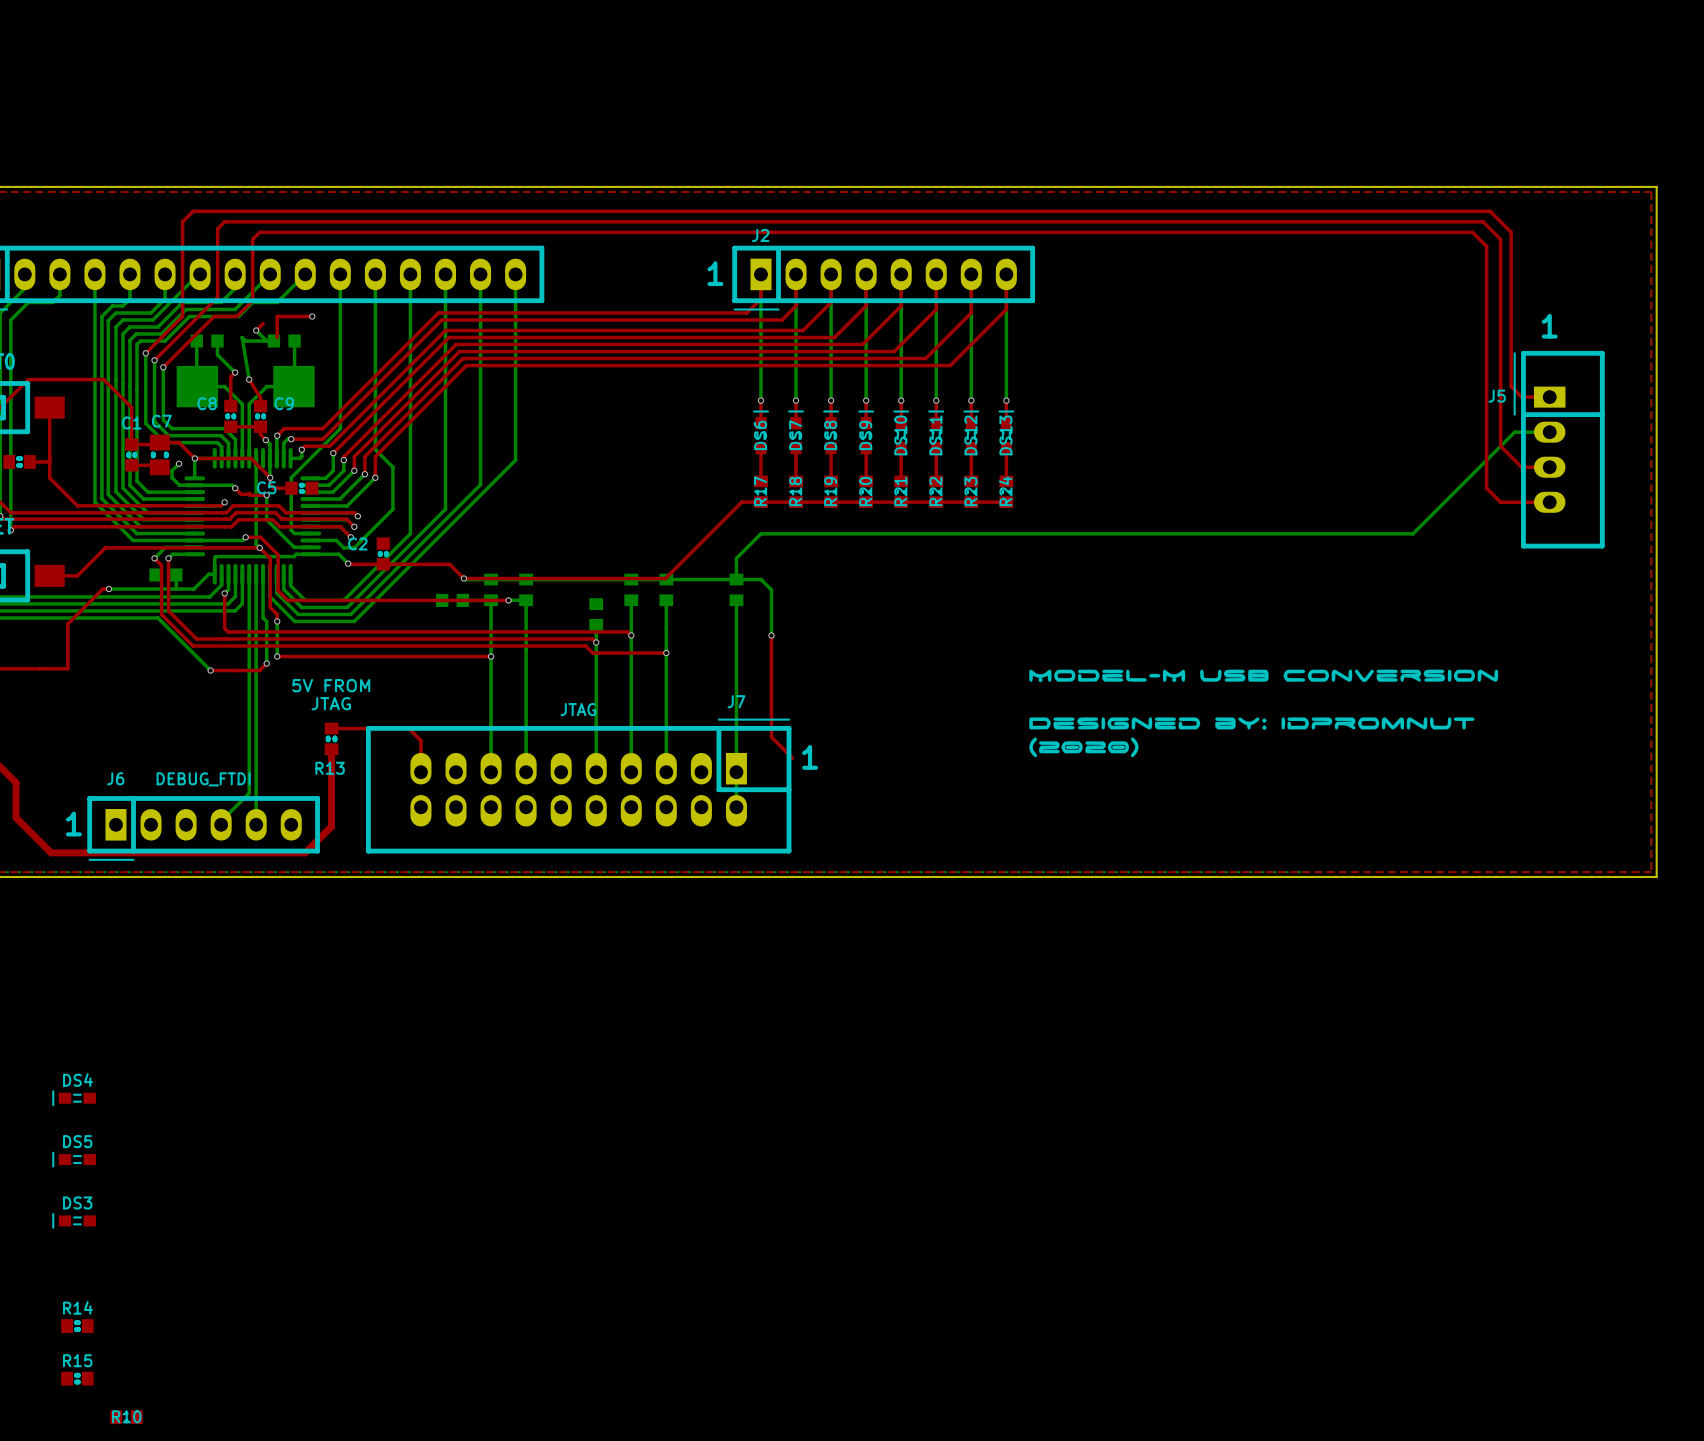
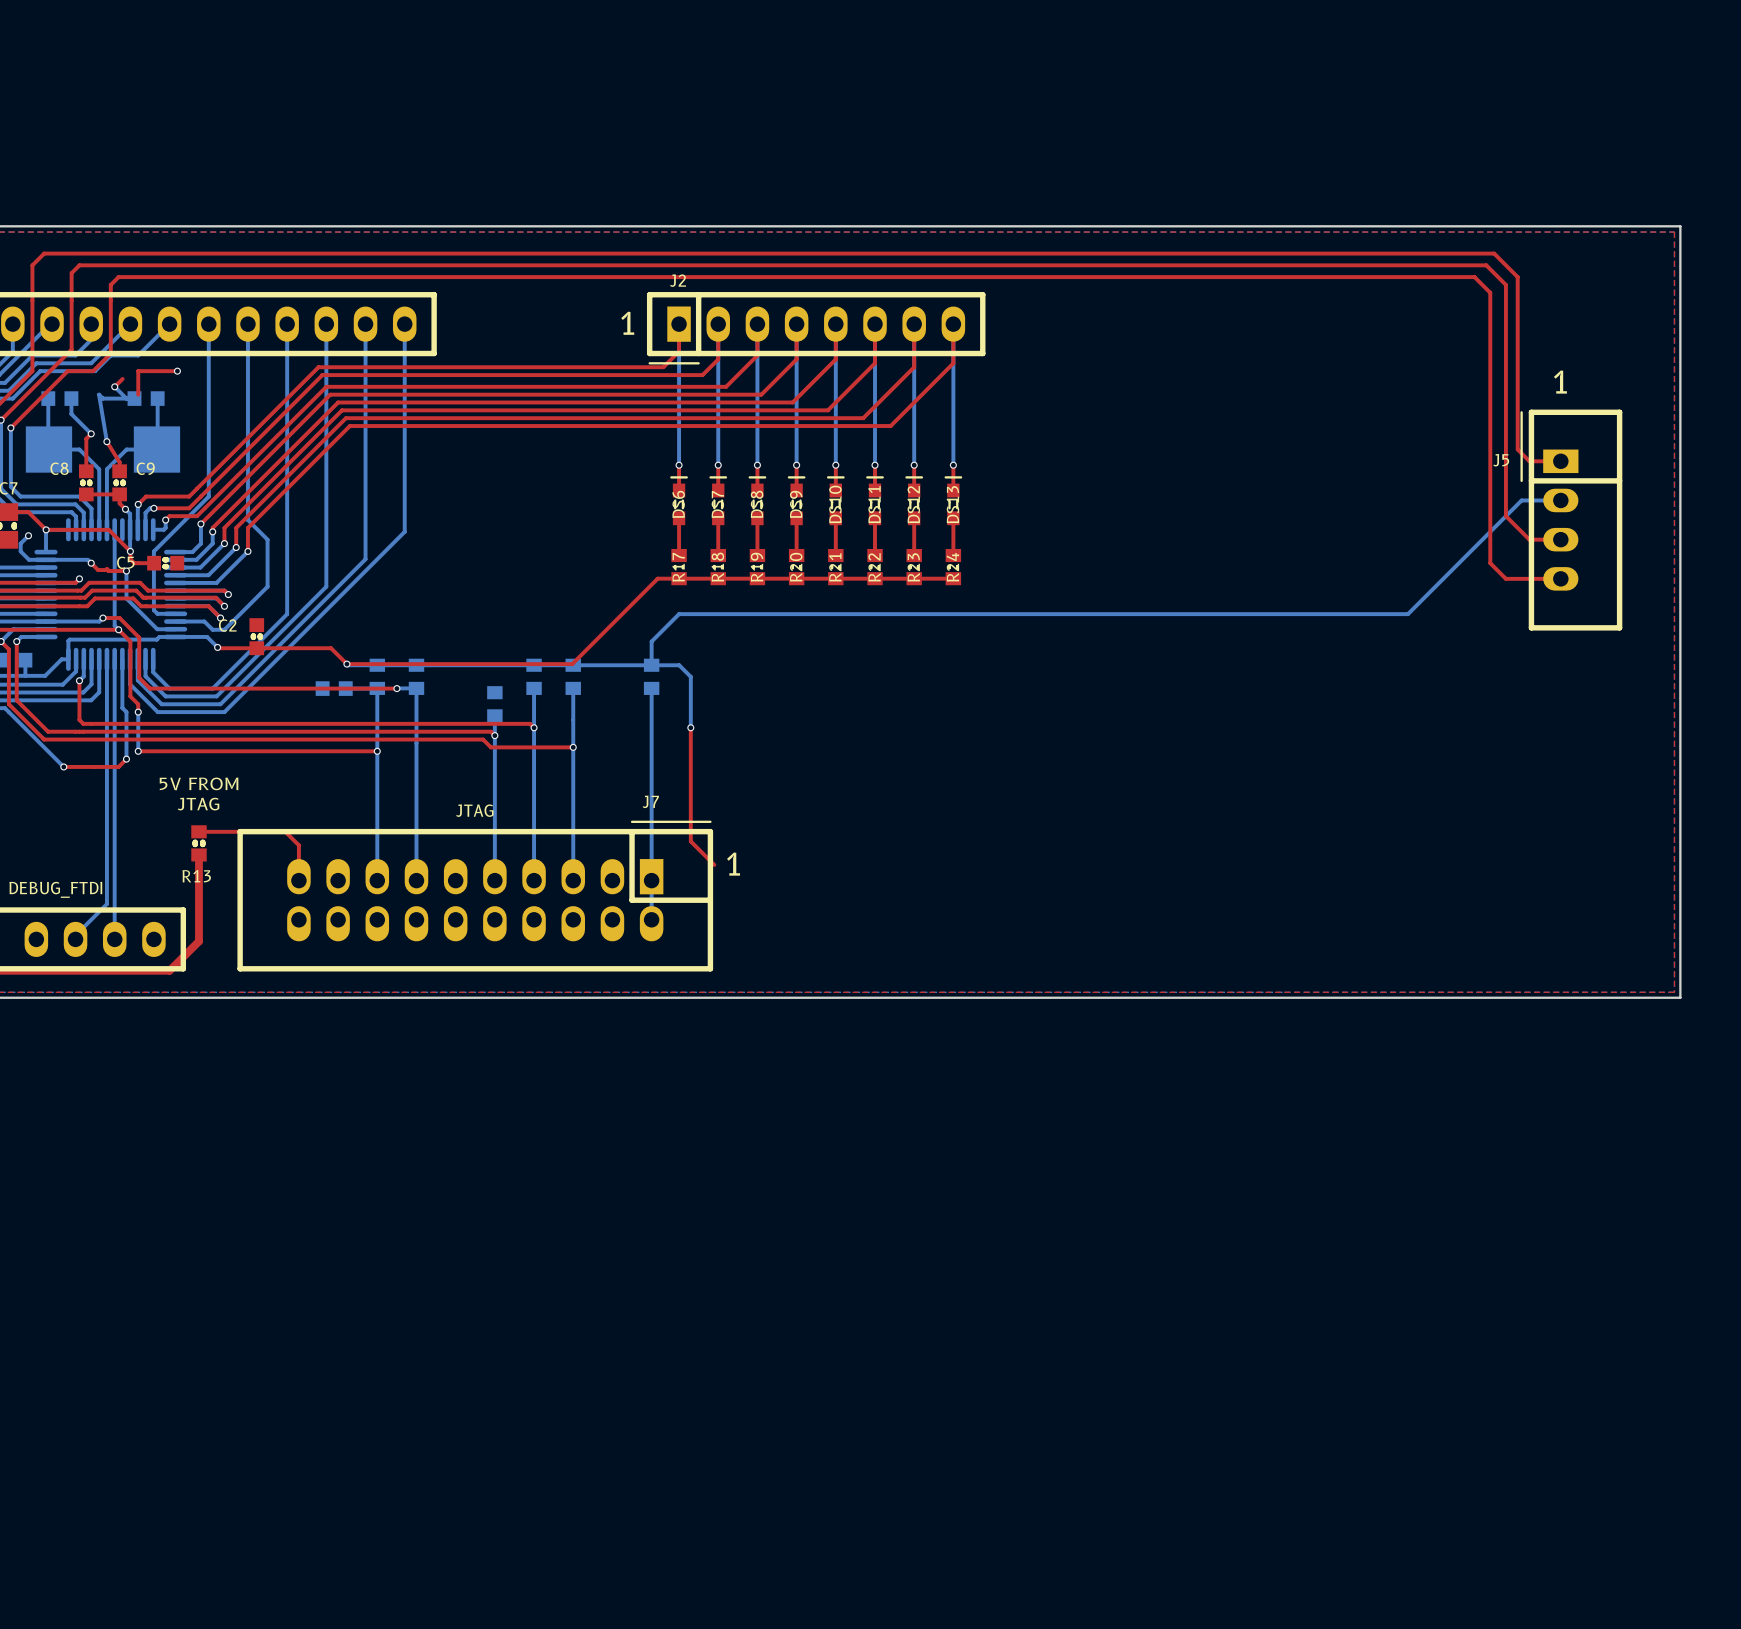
drawing: [1029, 669, 1499, 758] -> none

